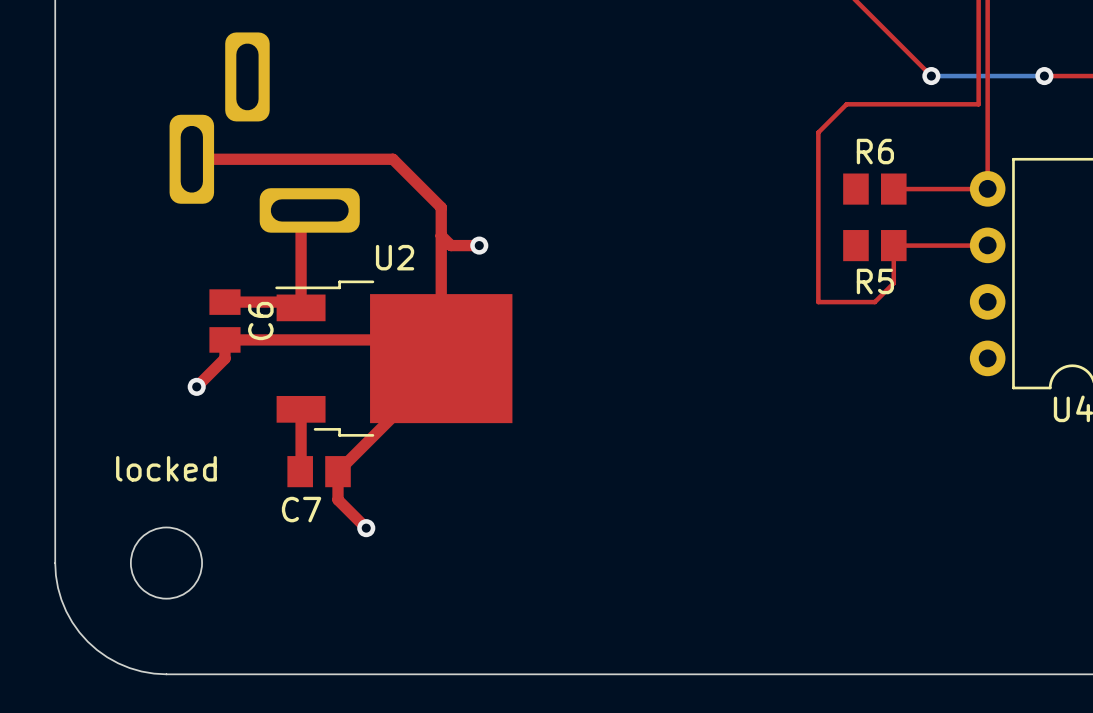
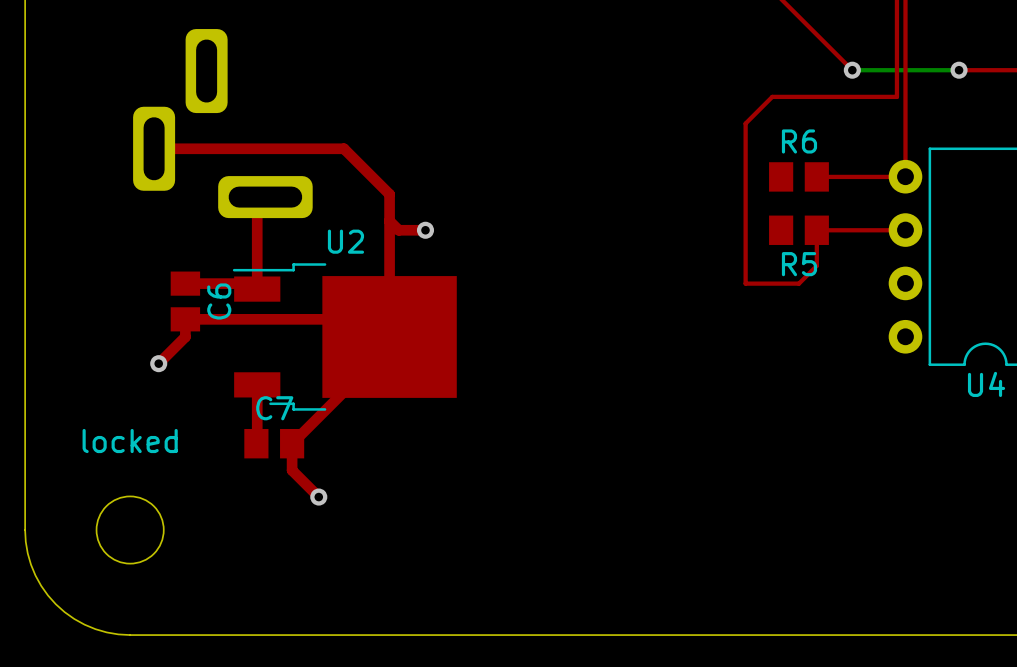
C7 name position: C7 (301, 509) -> C7 (274, 408)

